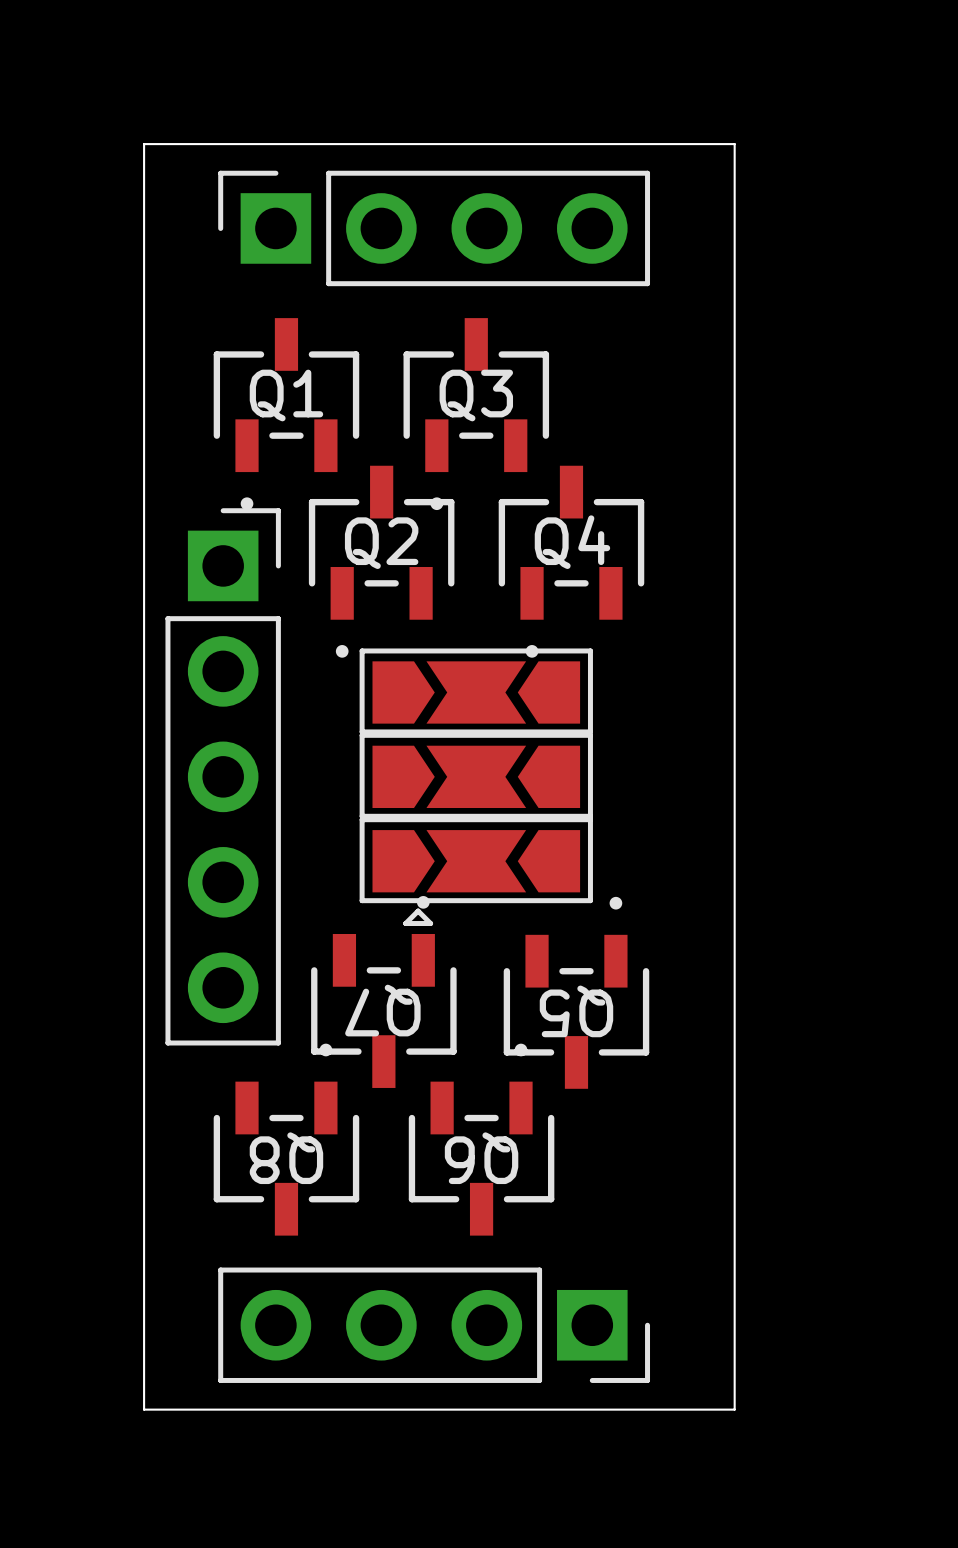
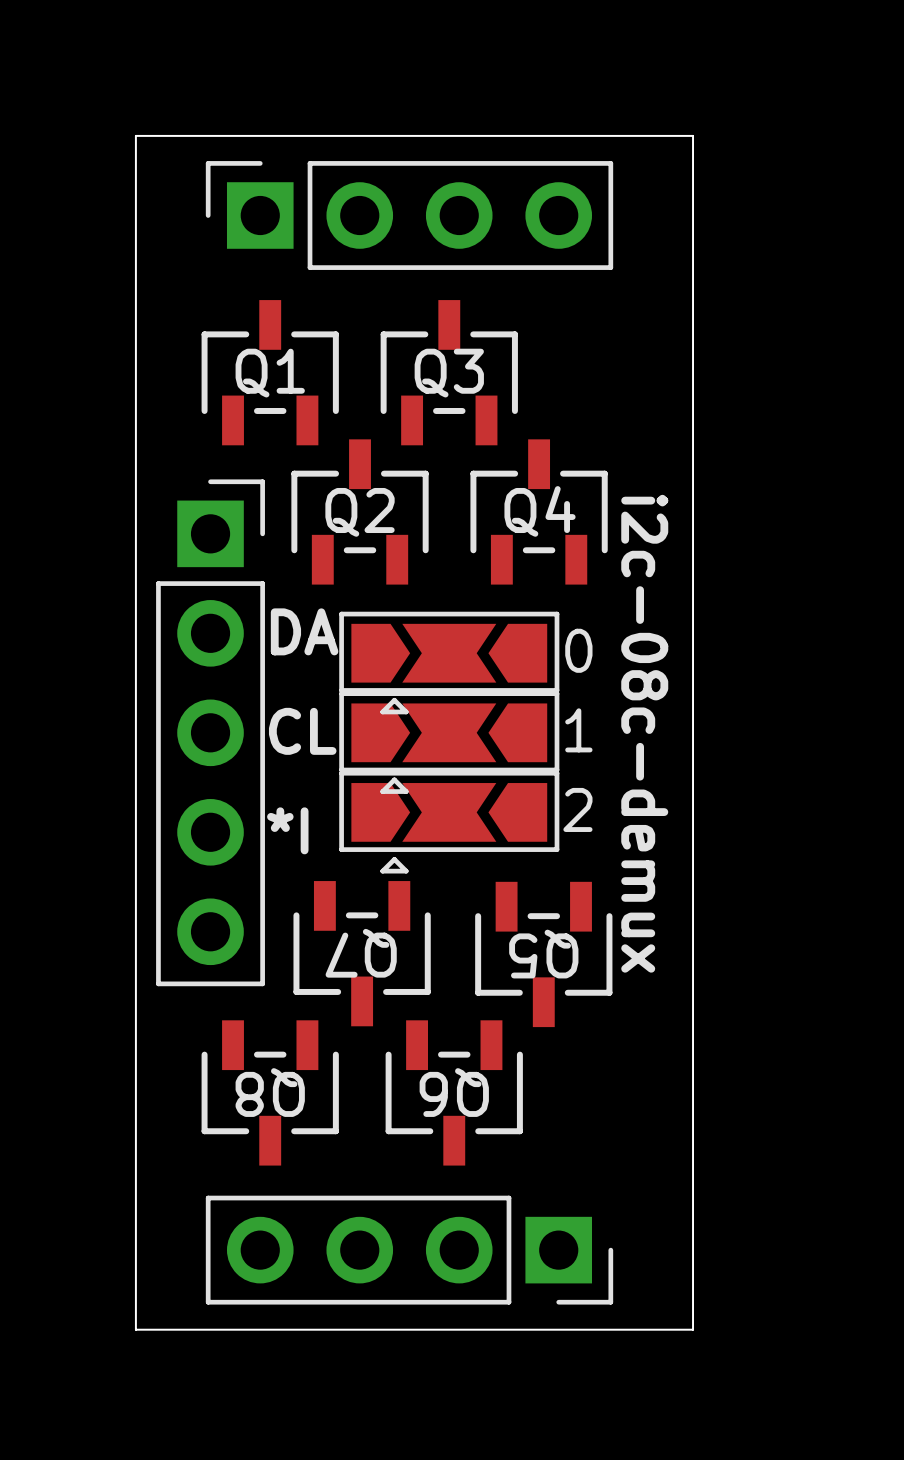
Q1 footprint: [213, 318, 360, 511] -> [201, 300, 339, 446]
Q3 footprint: [403, 318, 550, 511] -> [380, 300, 518, 446]
Q2 footprint: [308, 465, 455, 658] -> [291, 439, 429, 585]
Q4 footprint: [498, 465, 645, 658] -> [470, 439, 608, 585]
part footprint: [359, 648, 593, 735] -> [339, 611, 560, 715]
text: none -> DA (304, 631)
text: none -> 0 (578, 650)
part footprint: [359, 732, 593, 819] -> [339, 691, 560, 794]
text: none -> 1 (578, 730)
text: none -> CL (302, 731)
text: none -> i2c-08c-demux (644, 733)
text: none -> 2 (577, 809)
text: none -> *I (287, 830)
Q7 footprint: [311, 896, 457, 1088] -> [293, 881, 431, 1027]
Q5 footprint: [503, 896, 650, 1089] -> [475, 881, 613, 1028]
Q8 footprint: [213, 1043, 360, 1236] -> [201, 1020, 339, 1166]
Q6 footprint: [408, 1043, 555, 1236] -> [385, 1020, 523, 1166]

